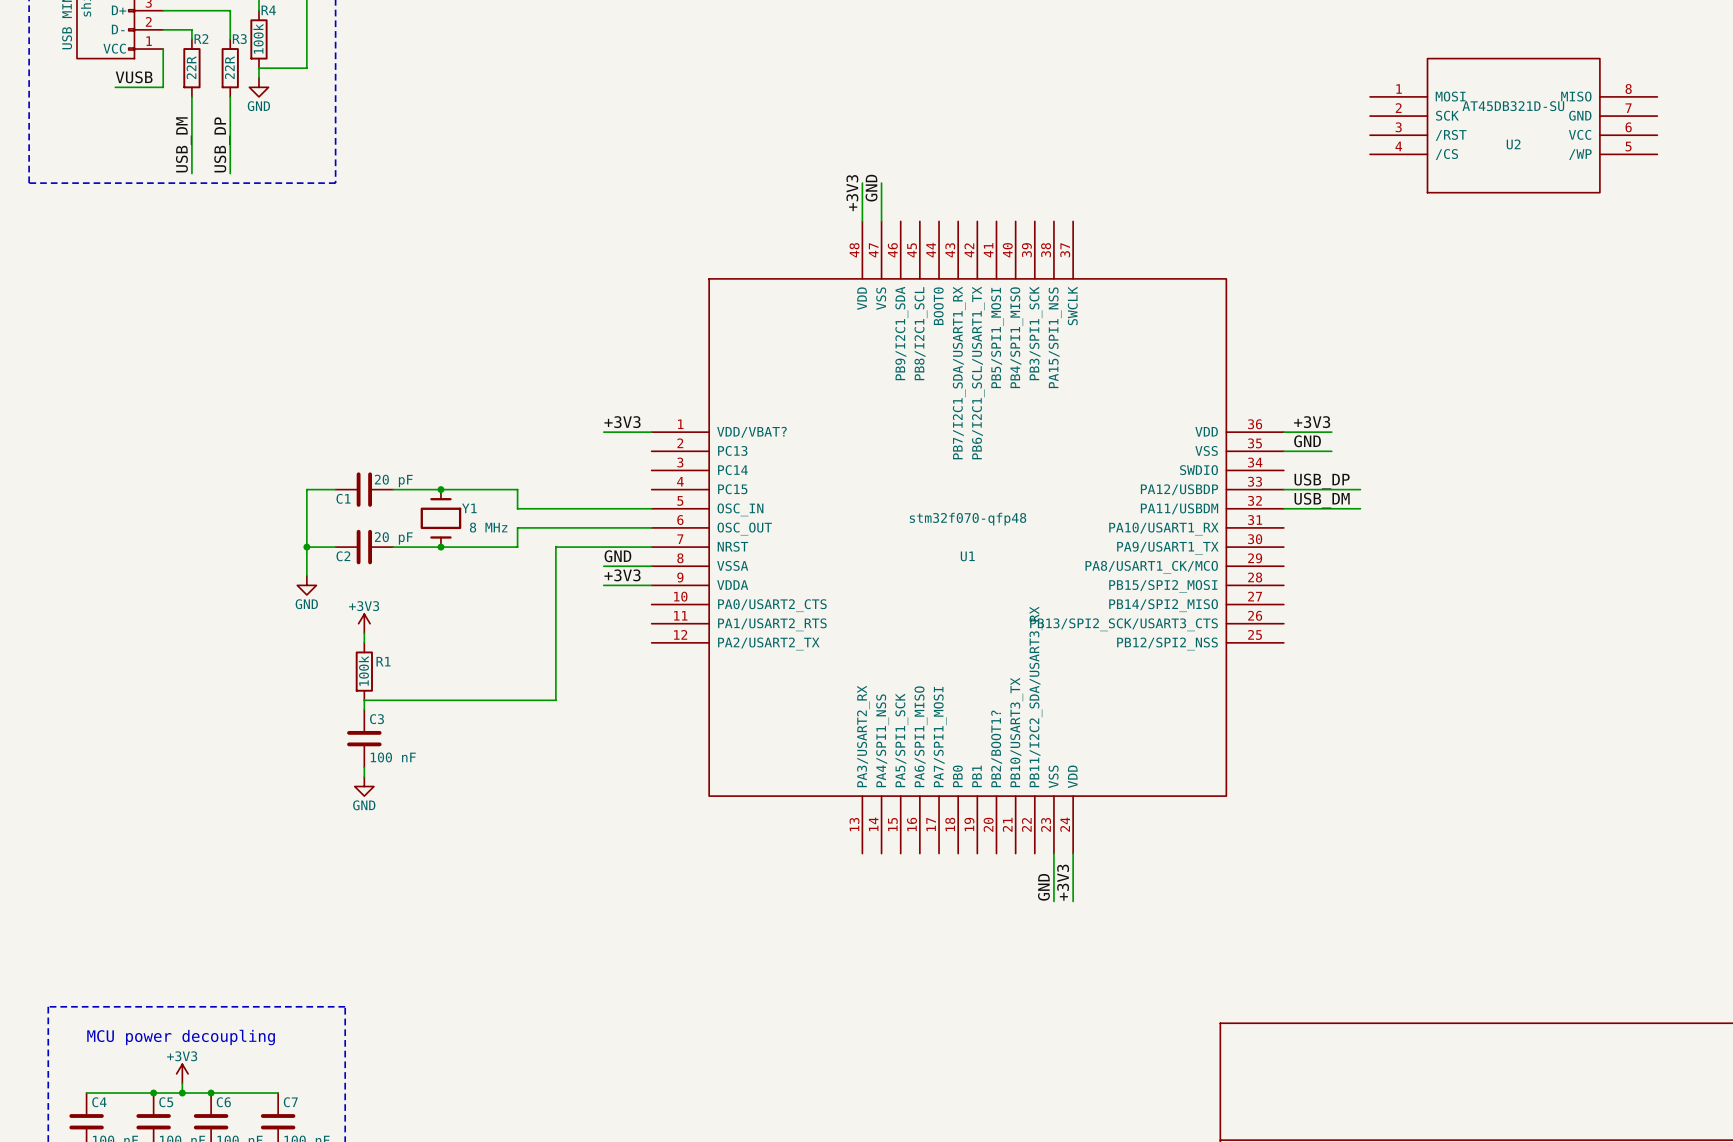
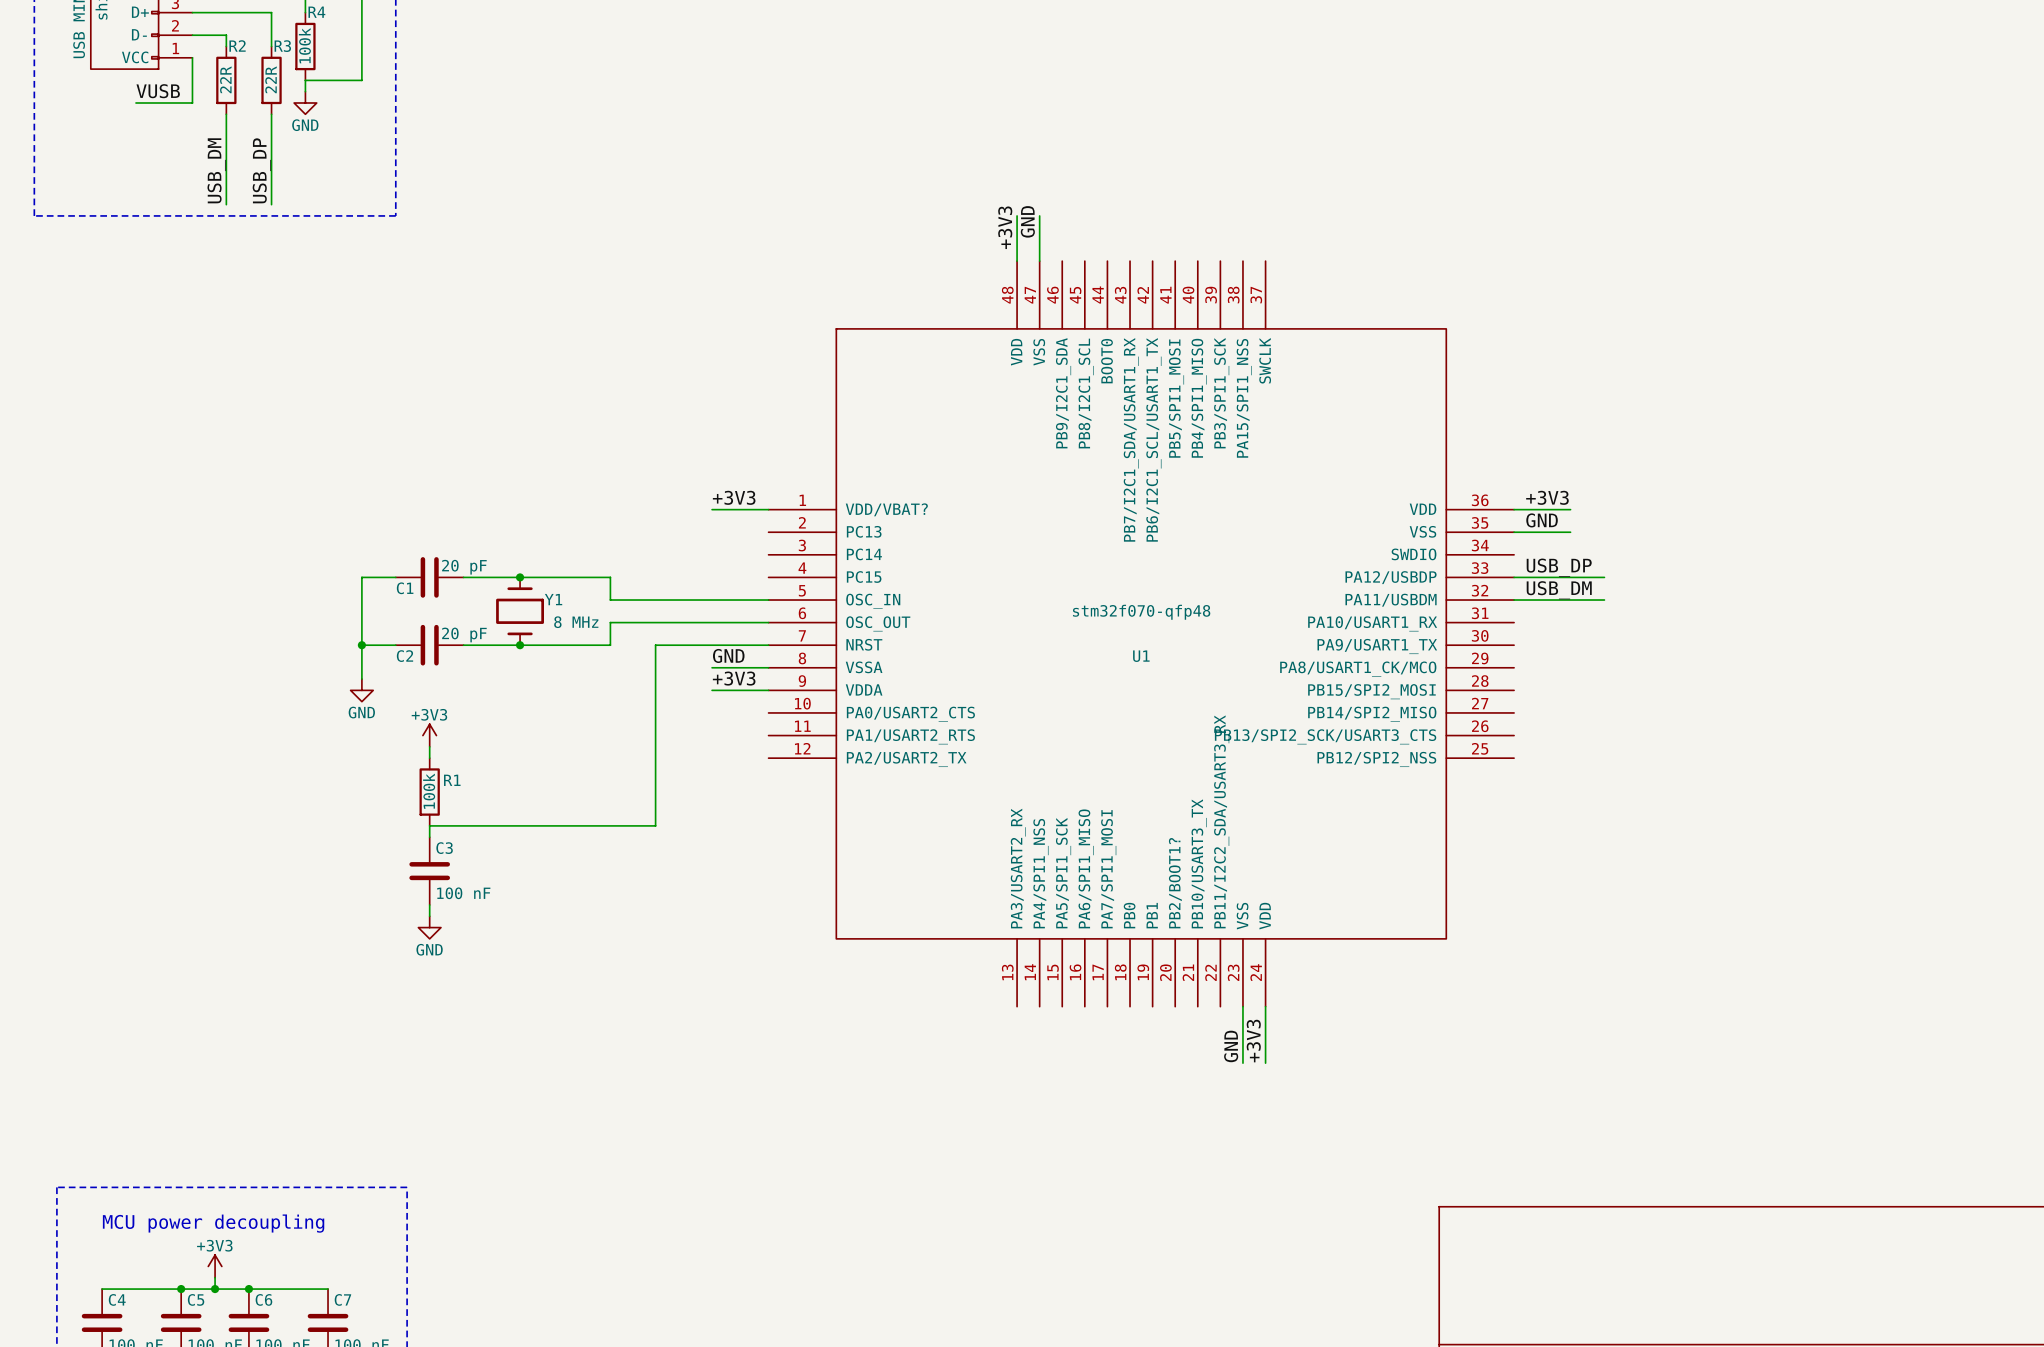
U2: AT45DB321D-SU (1513, 125) -> none

